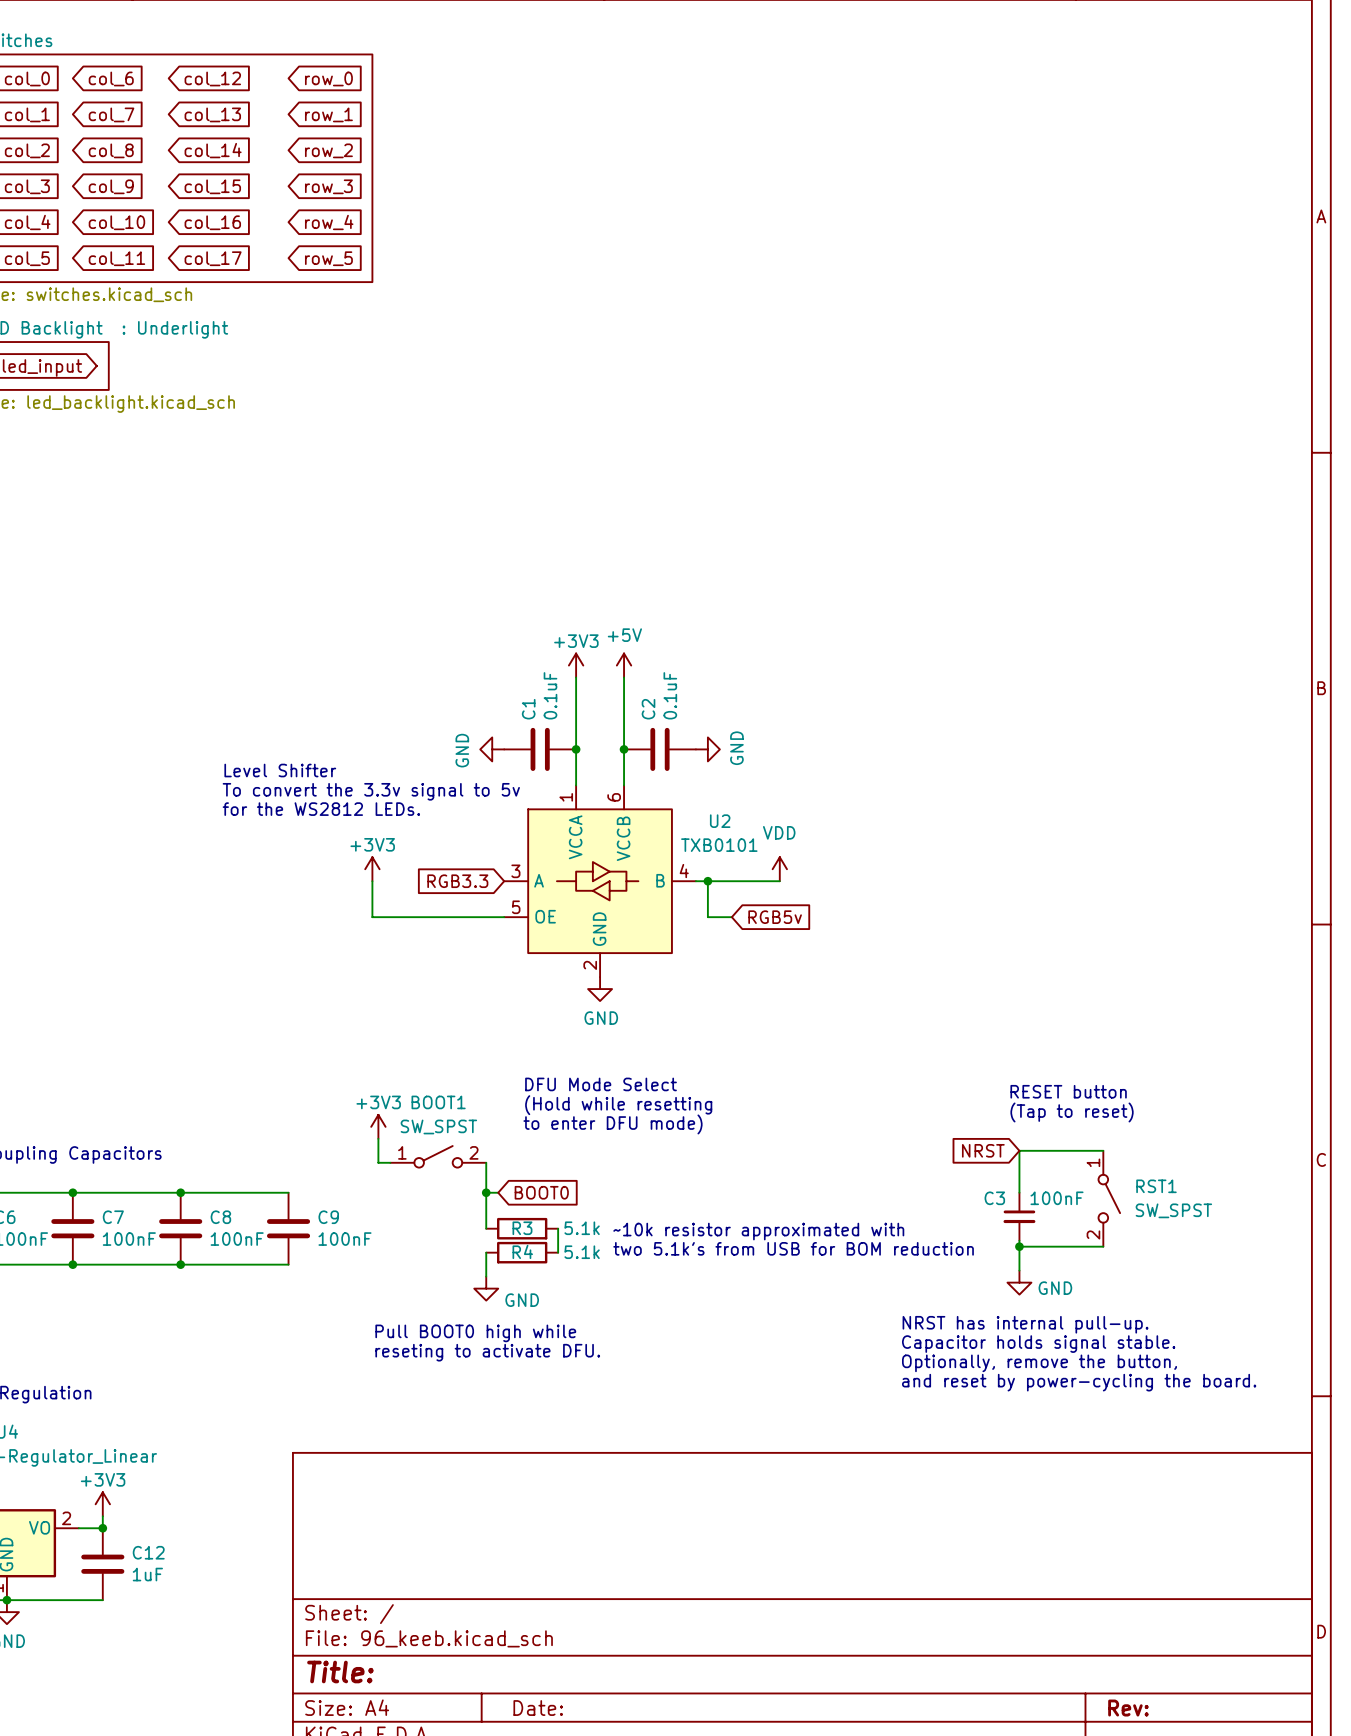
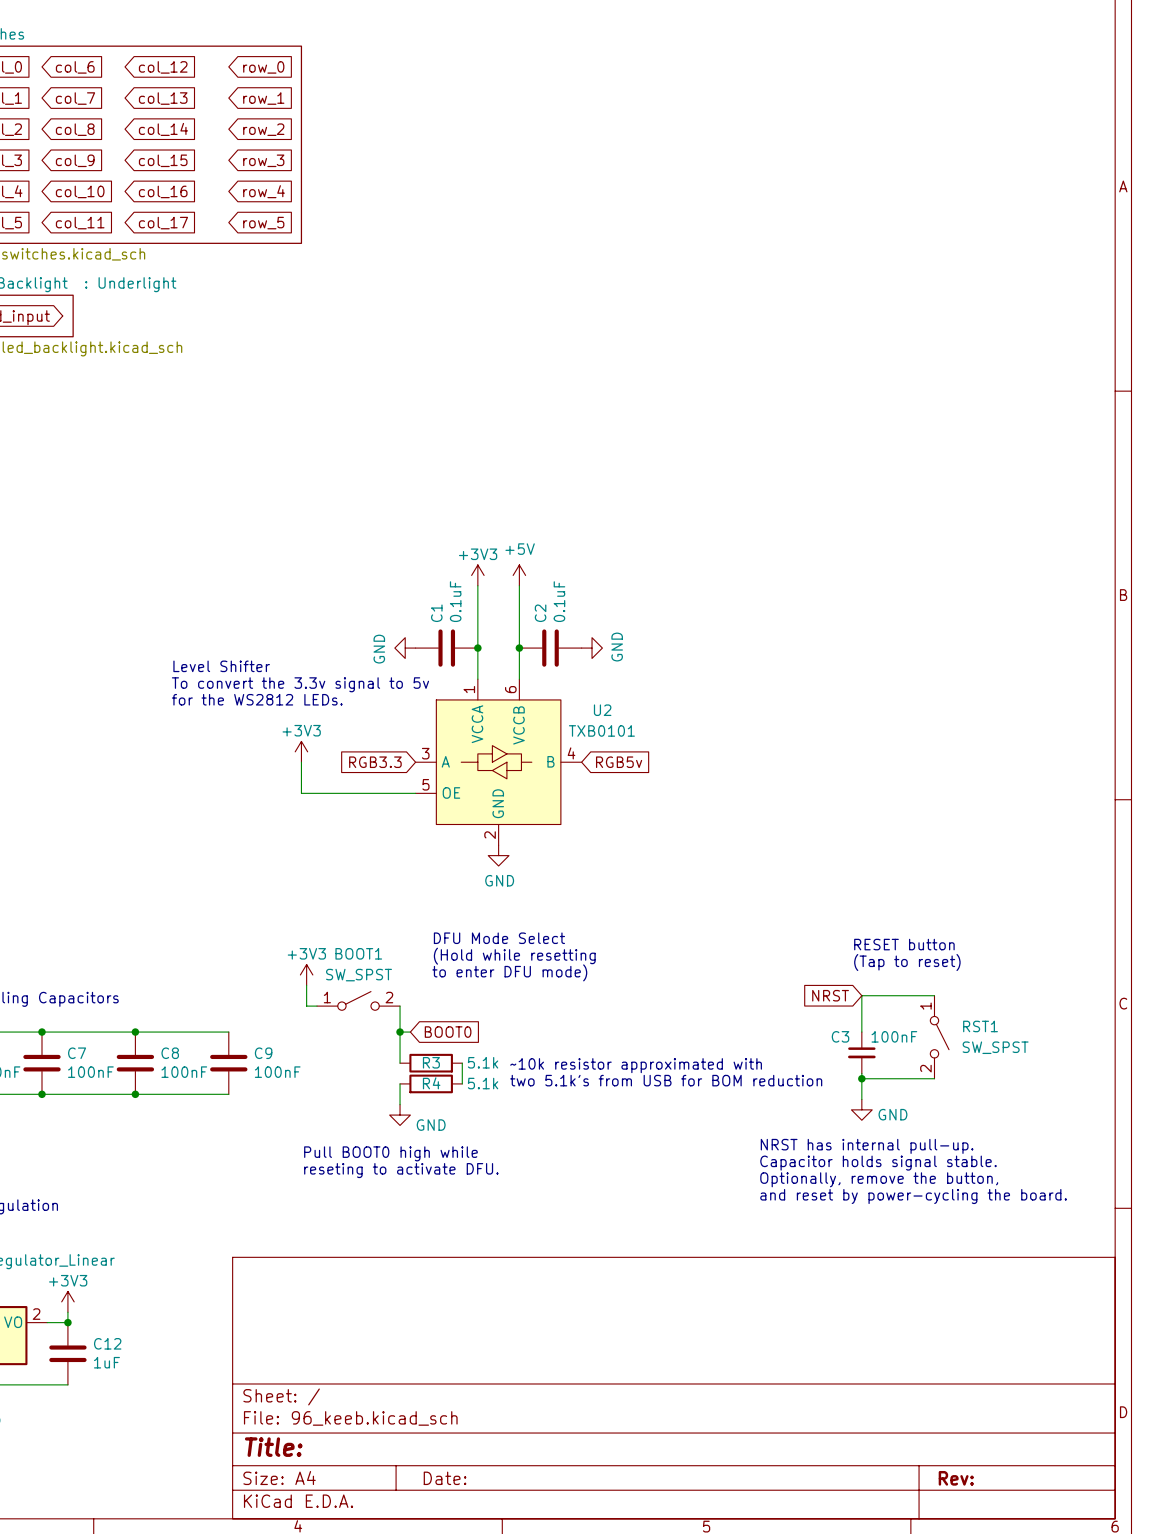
power symbol: VDD (779, 869) -> none
wire: (695, 881) (779, 881) -> none
wire: (707, 881) (707, 917) (731, 917) -> none
junction: (707, 881) -> none
global label position: RGB5v (775, 917) -> RGB5v (619, 762)

